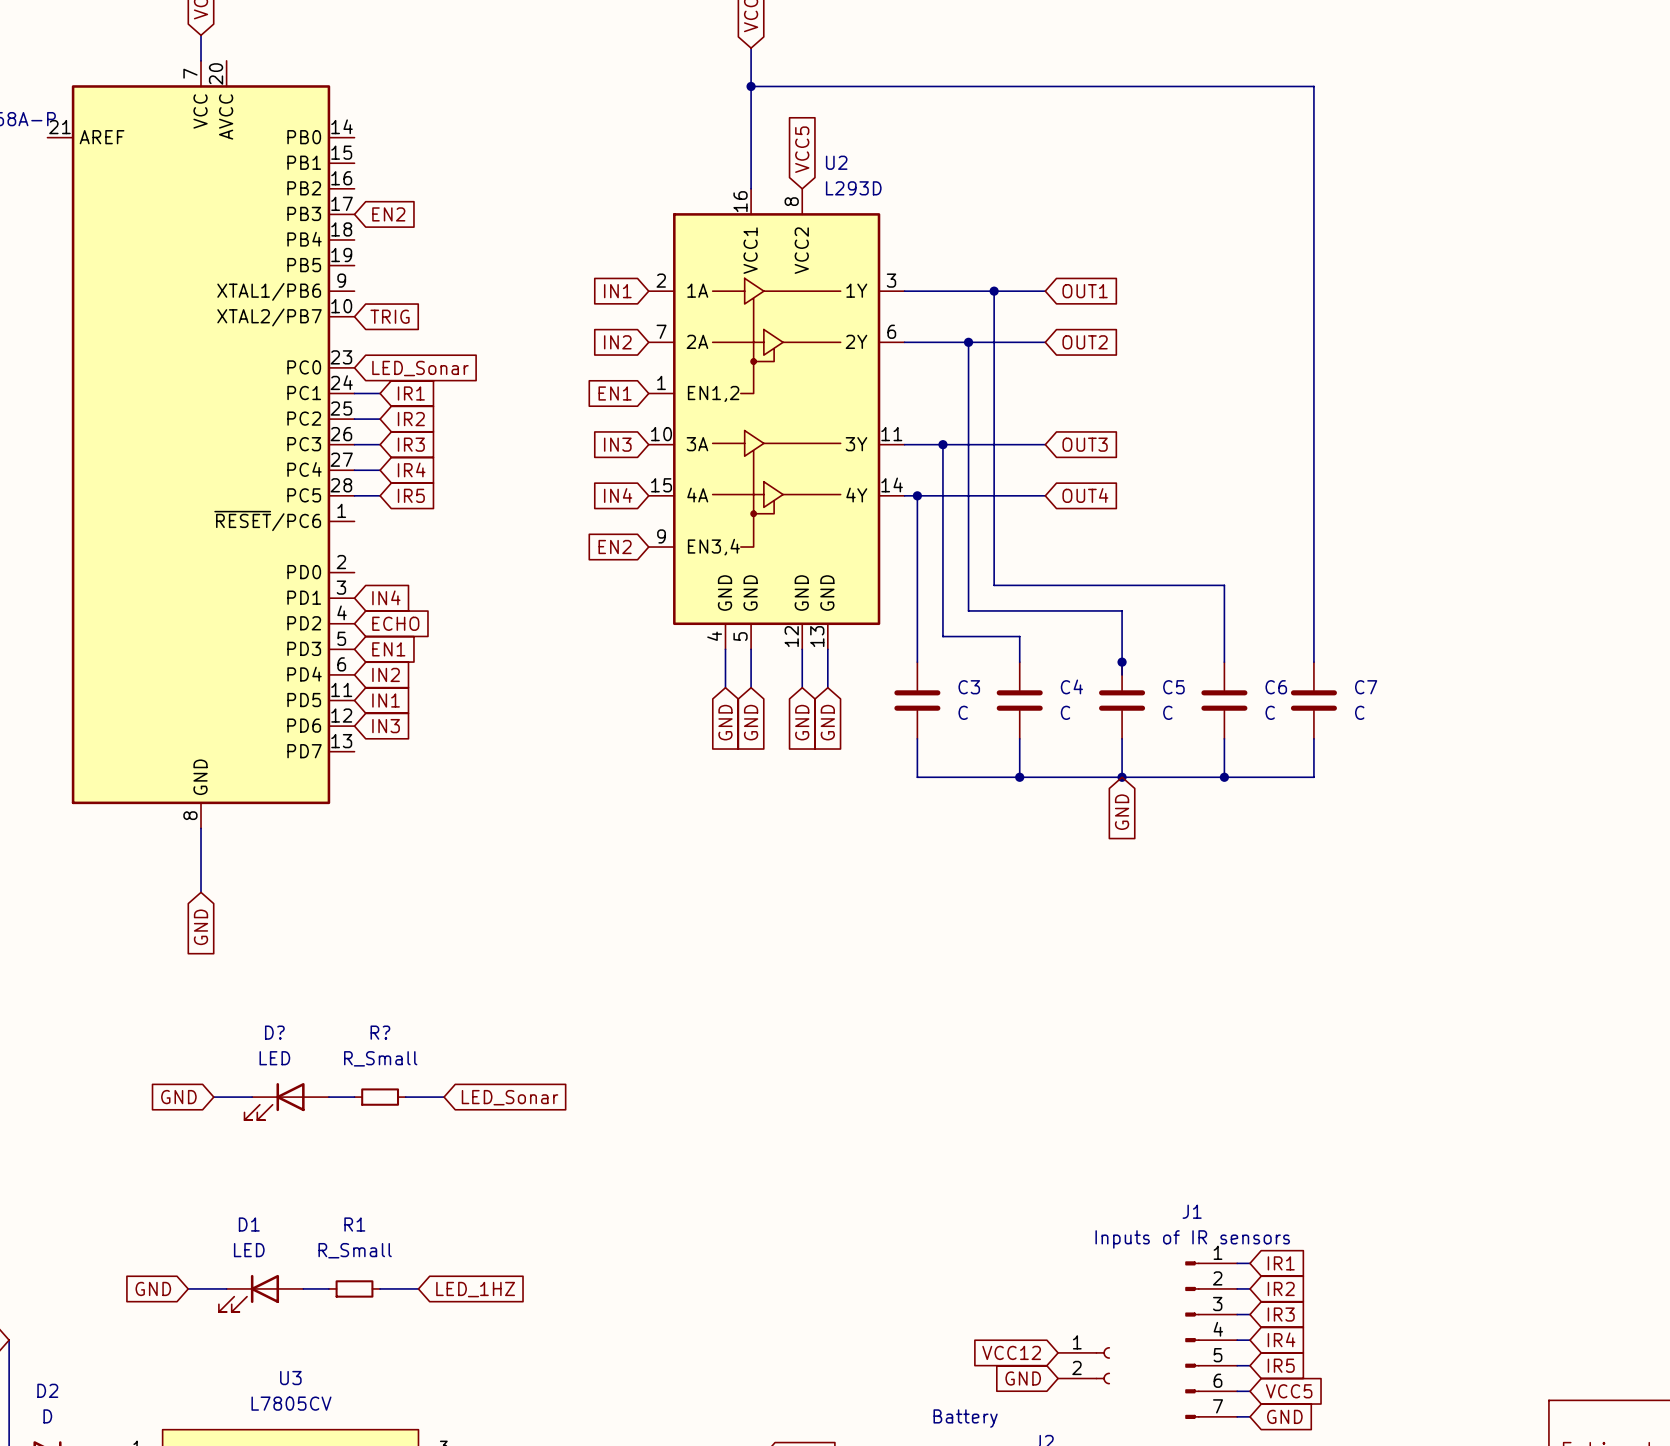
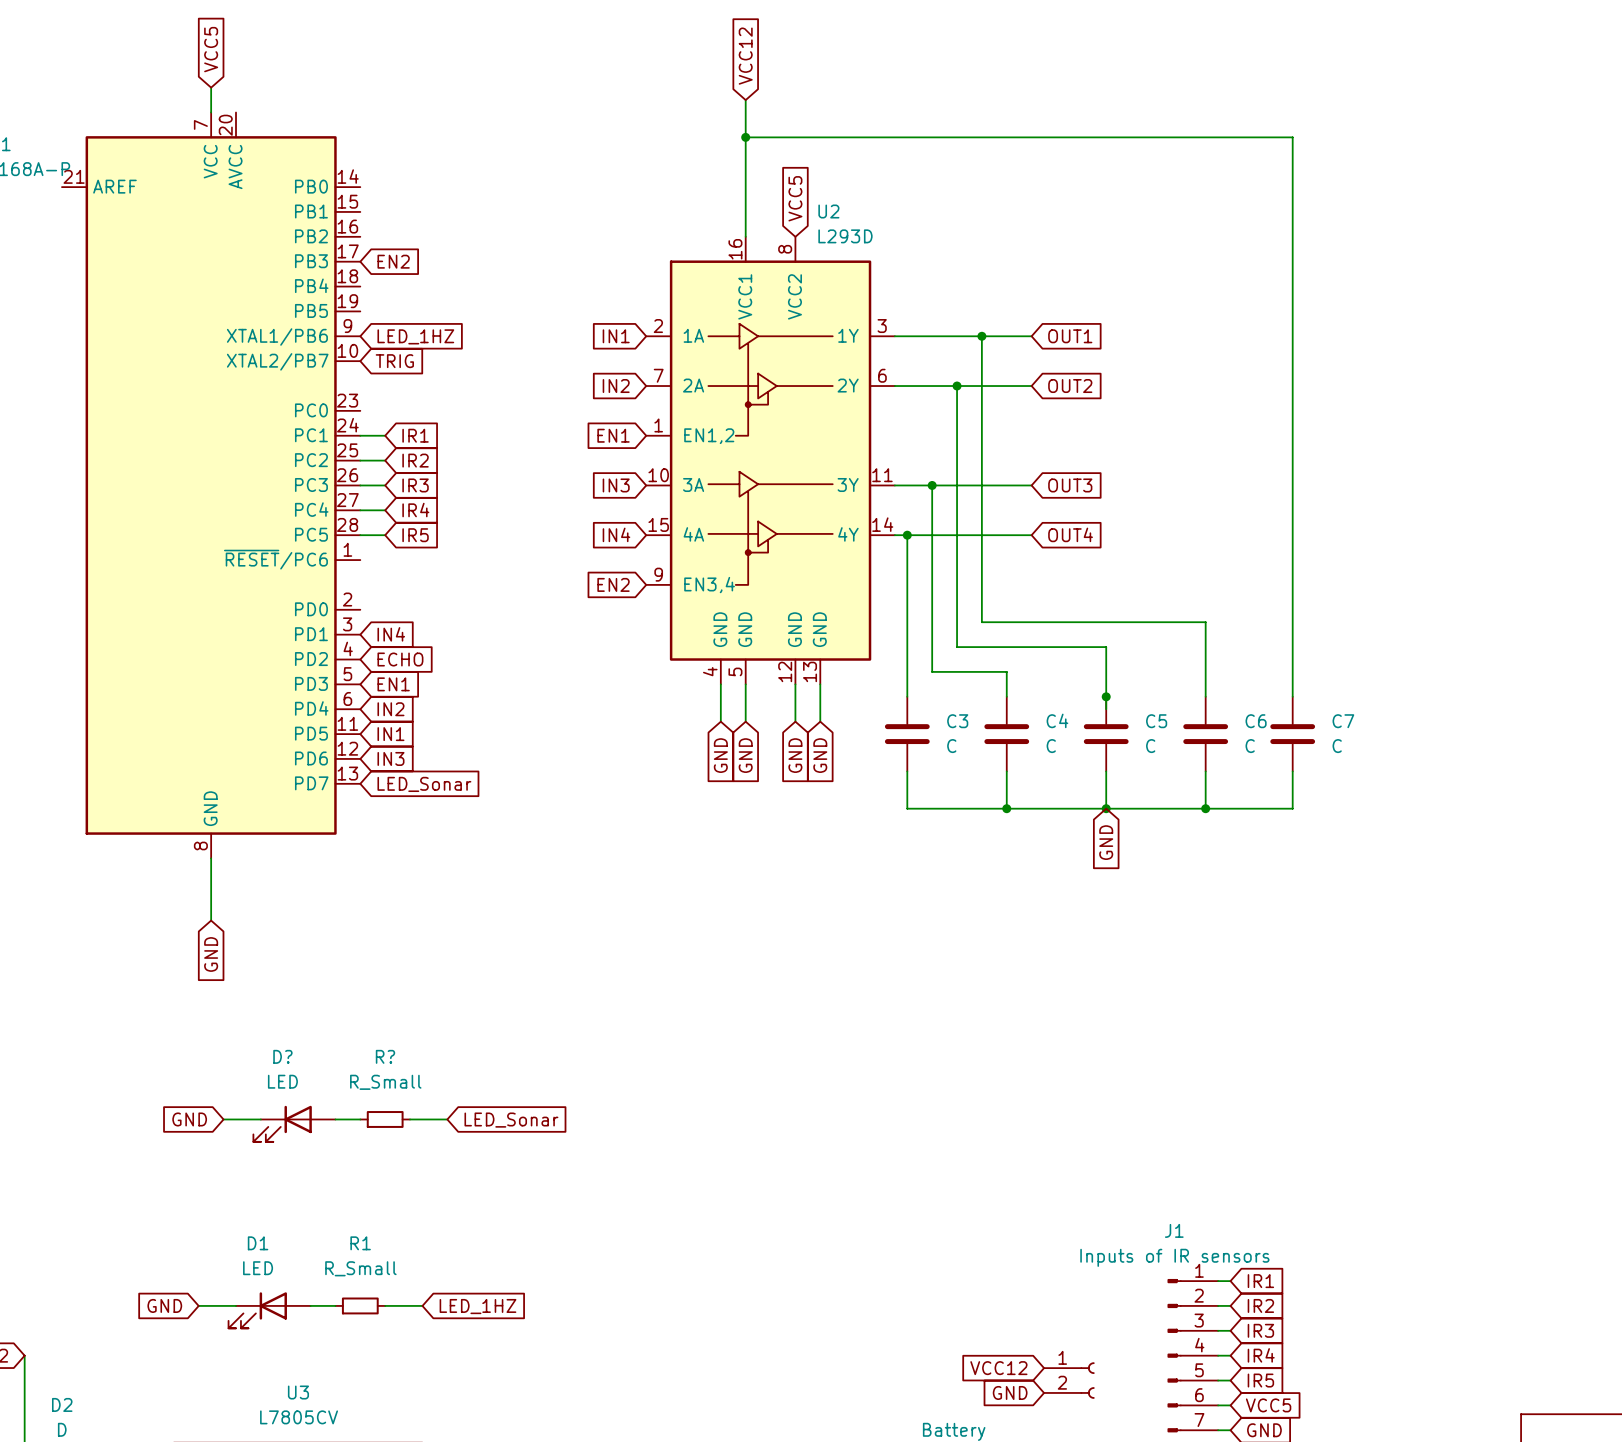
global label: none -> LED_1HZ (415, 336)
global label: LED_Sonar (420, 368) -> none
global label: none -> LED_Sonar (424, 784)

